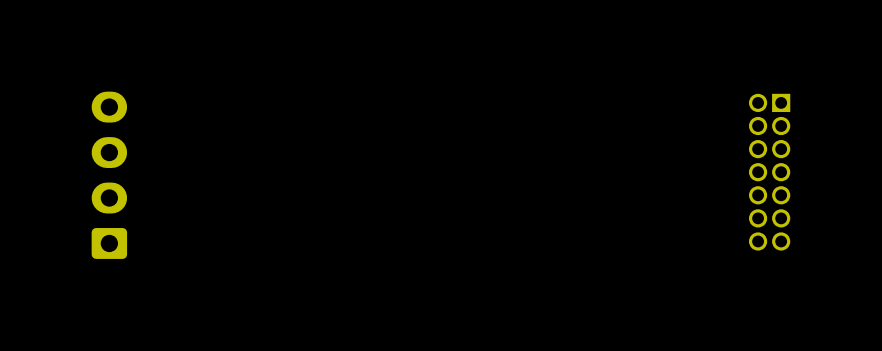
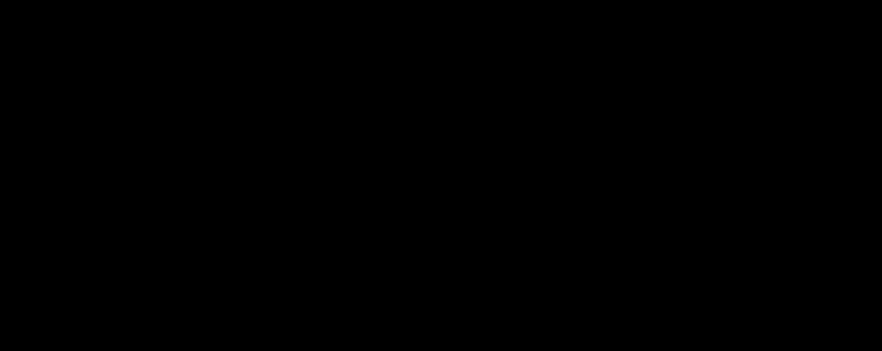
part: (769, 172) -> none
part: (109, 175) -> none

